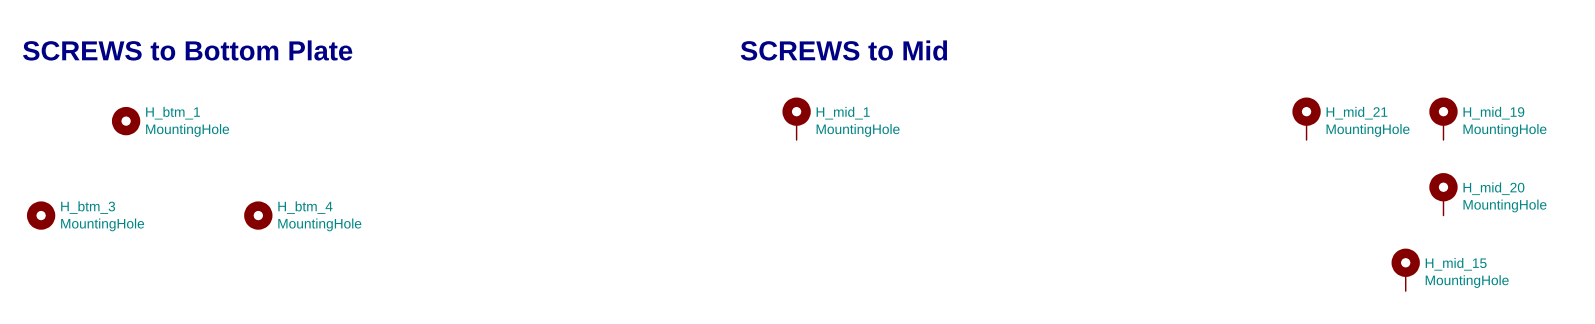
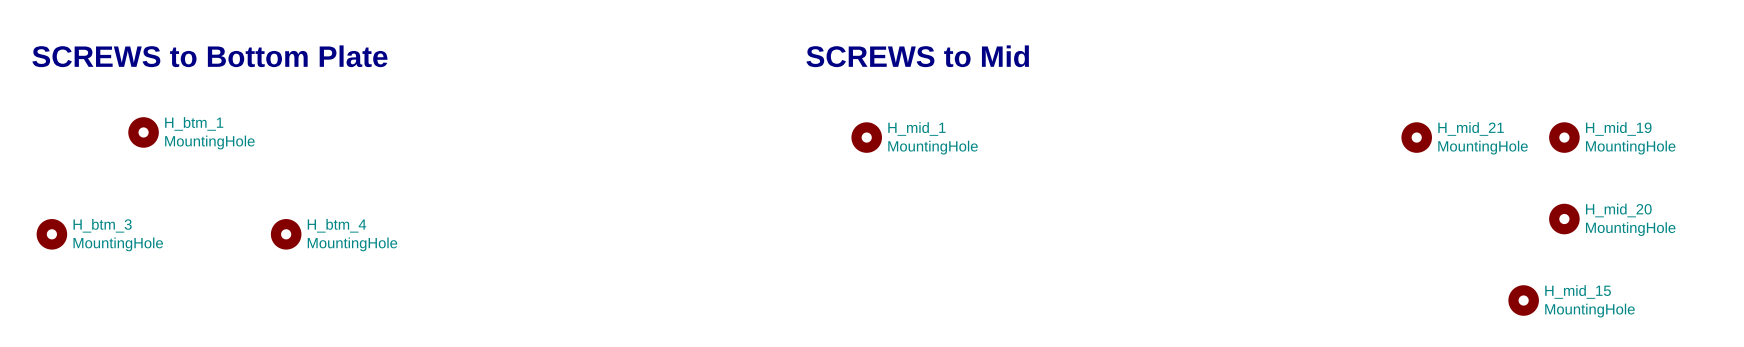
H_mid_1 symbol: [782, 97, 811, 141] -> [851, 122, 882, 153]
H_mid_21 symbol: [1292, 97, 1321, 141] -> [1401, 122, 1432, 153]
H_mid_19 symbol: [1429, 97, 1458, 141] -> [1549, 122, 1580, 153]
H_mid_20 symbol: [1429, 173, 1458, 216] -> [1549, 203, 1580, 235]
H_mid_15 symbol: [1391, 248, 1420, 292] -> [1508, 285, 1539, 316]

